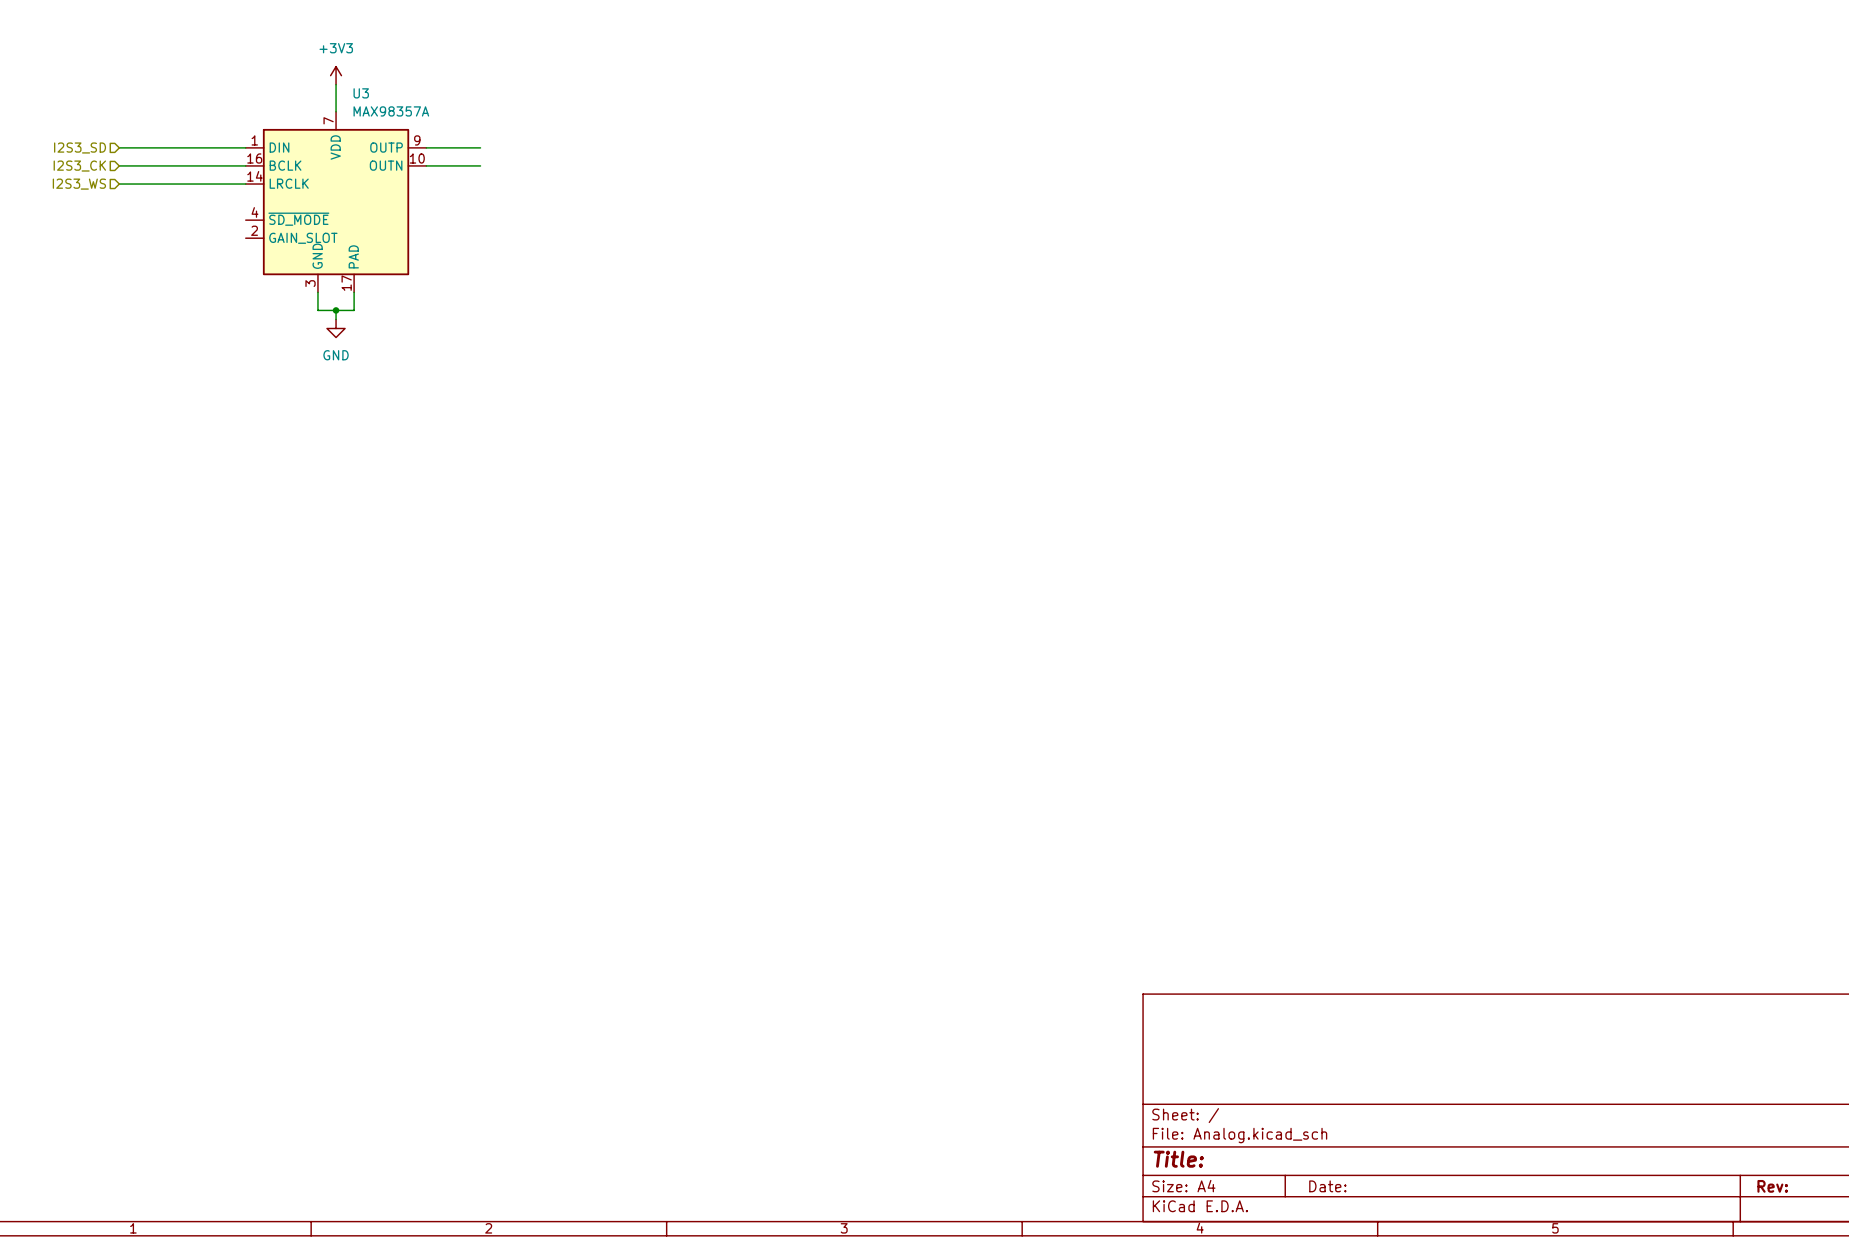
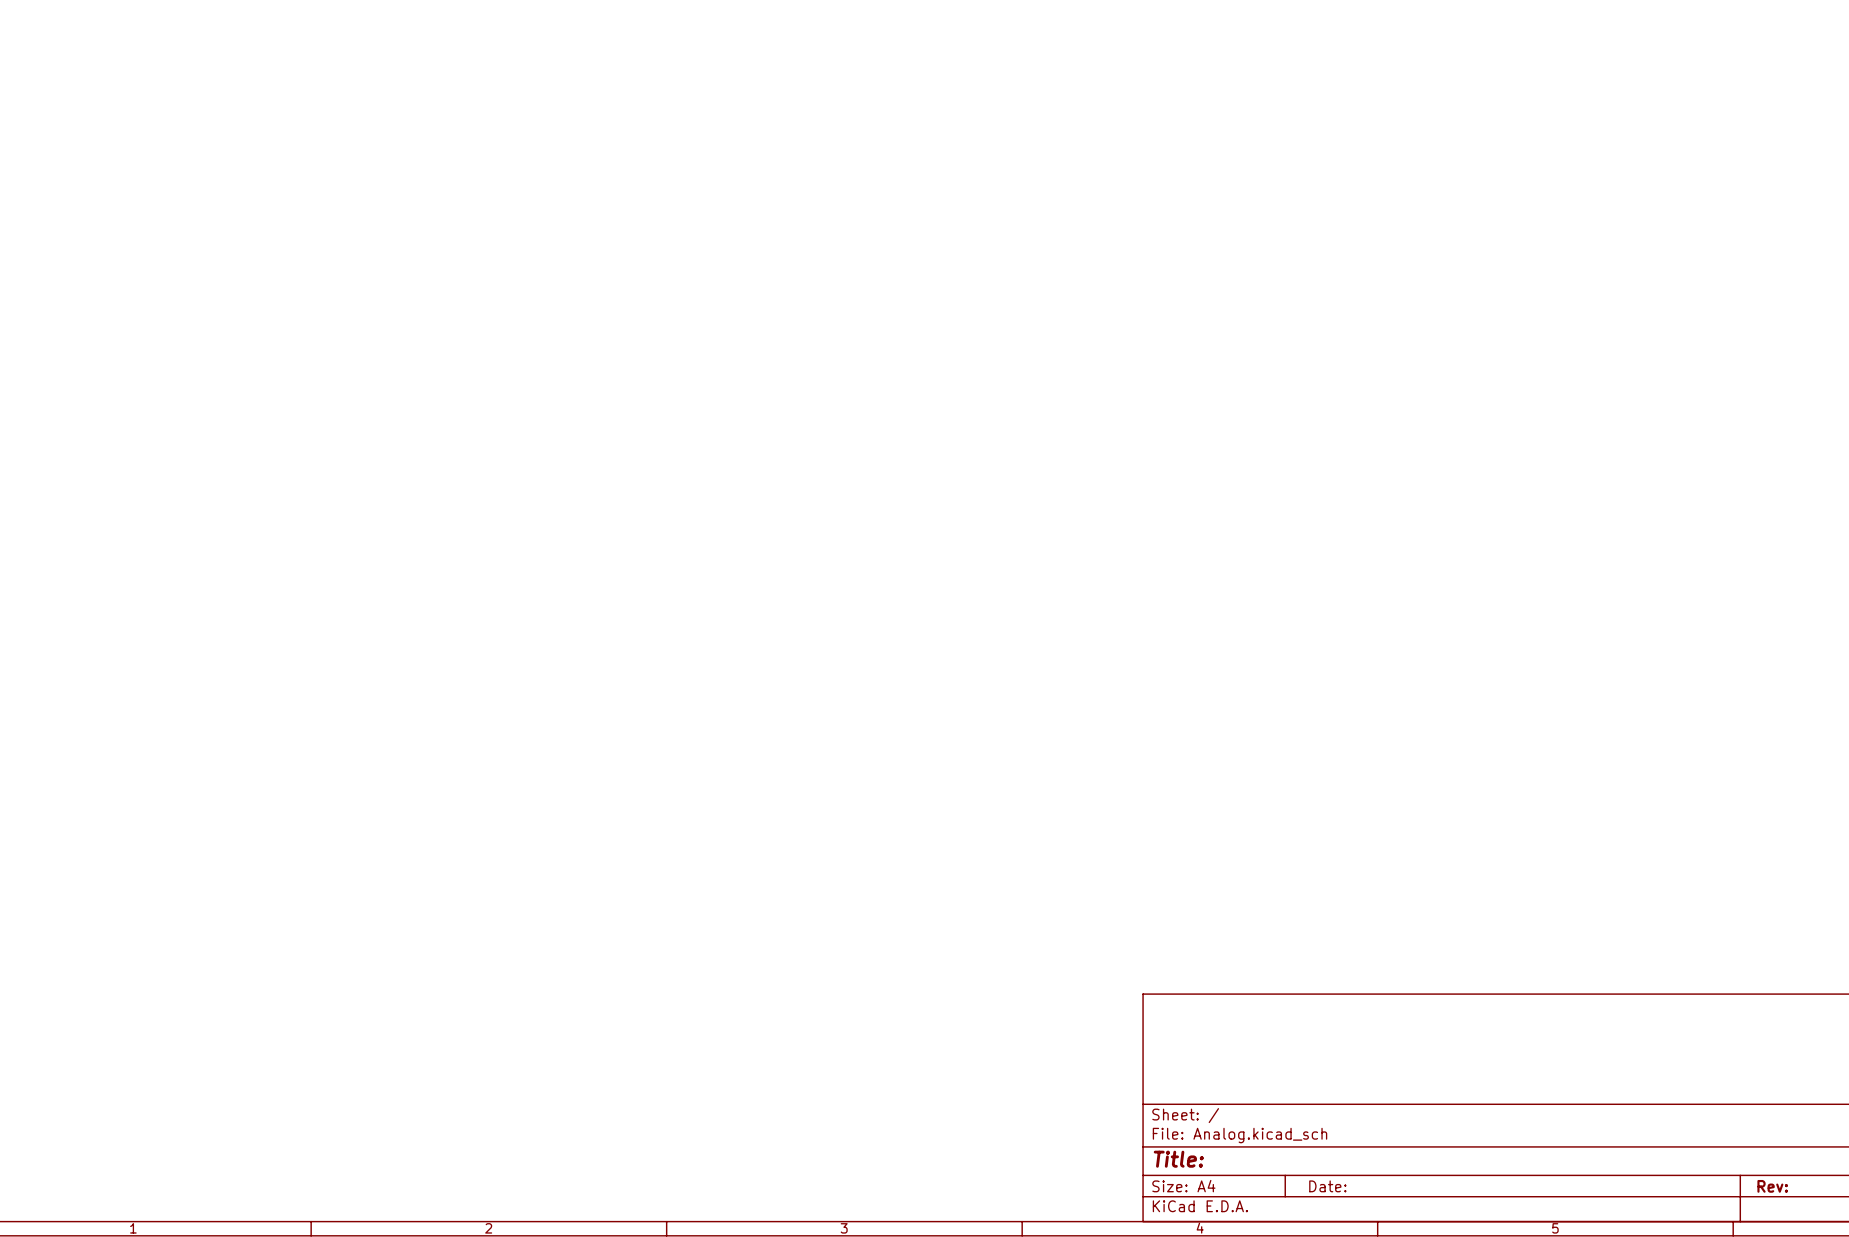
power symbol: +3V3 (336, 75) -> none
wire: (336, 84) (336, 111) -> none
hierarchical label: I2S3_SD (80, 147) -> none
wire: (119, 147) (245, 147) -> none
wire: (426, 147) (480, 147) -> none
wire: (119, 165) (245, 165) -> none
wire: (426, 165) (480, 165) -> none
hierarchical label: I2S3_CK (79, 166) -> none
hierarchical label: I2S3_WS (79, 184) -> none
wire: (119, 184) (245, 184) -> none
U3: MAX98357A (336, 202) -> none
wire: (317, 292) (317, 310) (354, 310) (354, 292) -> none
wire: (336, 310) (336, 319) -> none
junction: (336, 310) -> none
power symbol: GND (336, 328) -> none

